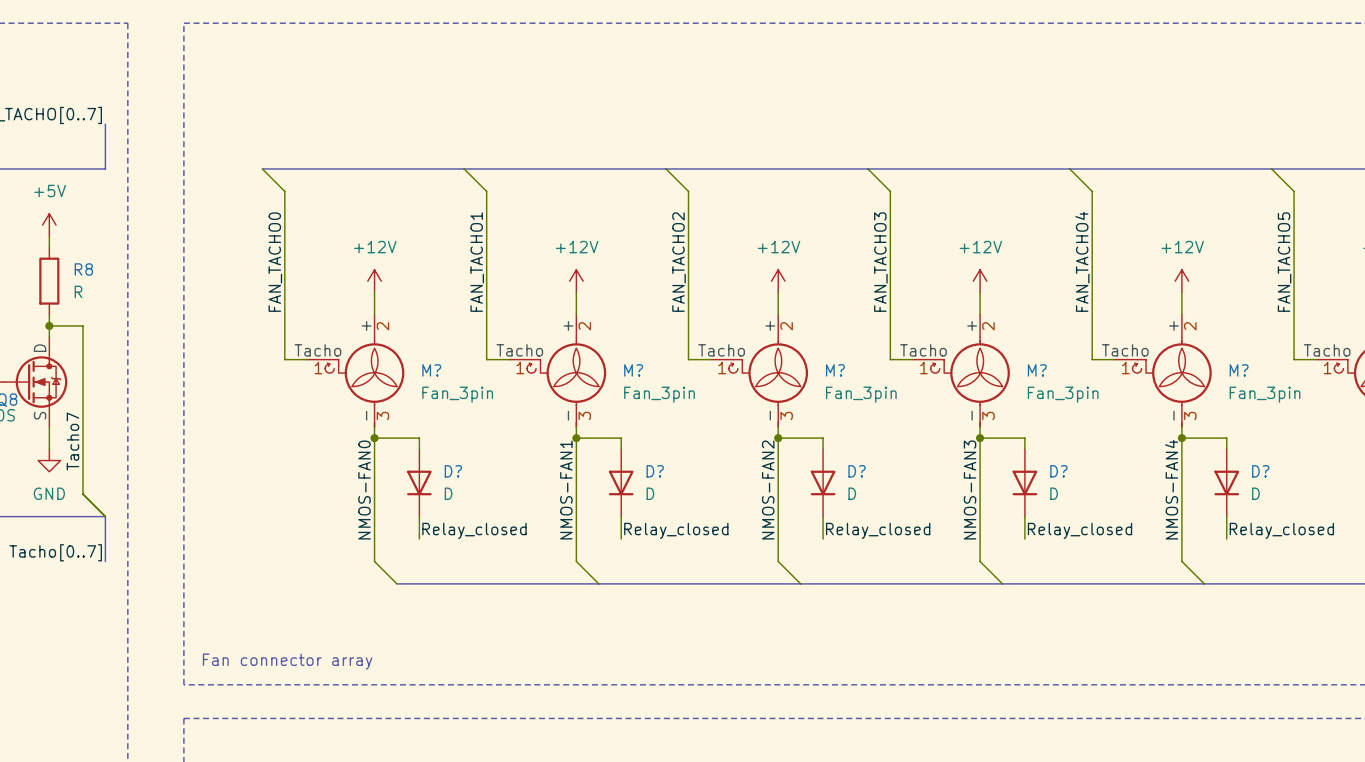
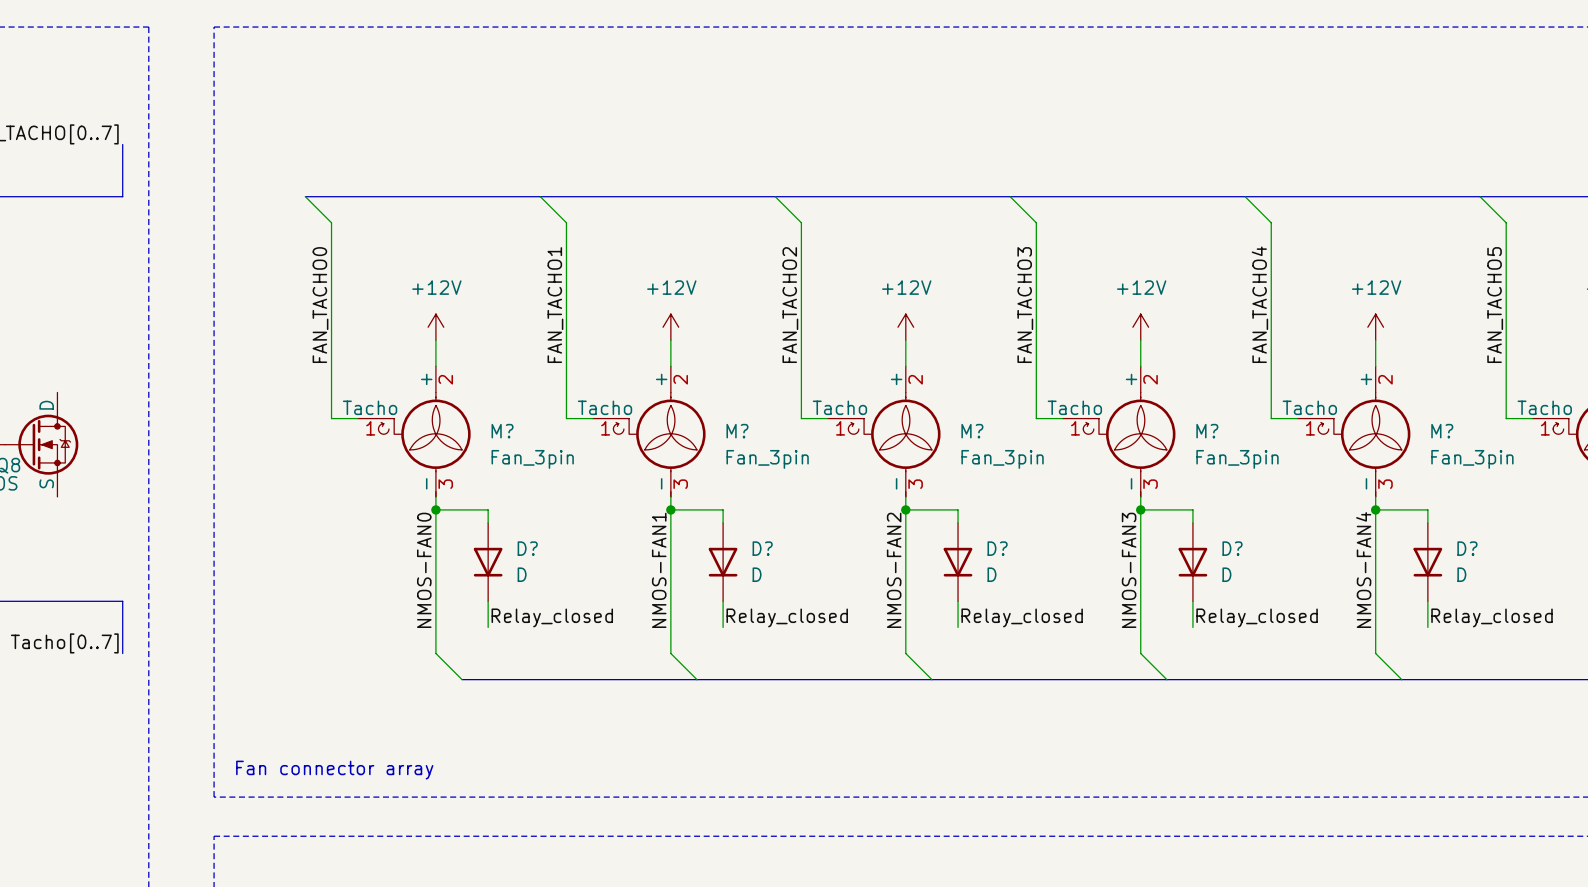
power symbol: +5V (49, 225) -> none
wire: (49, 236) (49, 247) -> none
R8: R (49, 281) -> none
wire: (49, 314) (49, 337) -> none
wire: (49, 325) (82, 325) (82, 494) (105, 516) -> none
junction: (49, 325) -> none
wire: (49, 426) (49, 449) -> none
label: Tacho7 (72, 441) -> none
power symbol: GND (49, 460) -> none

